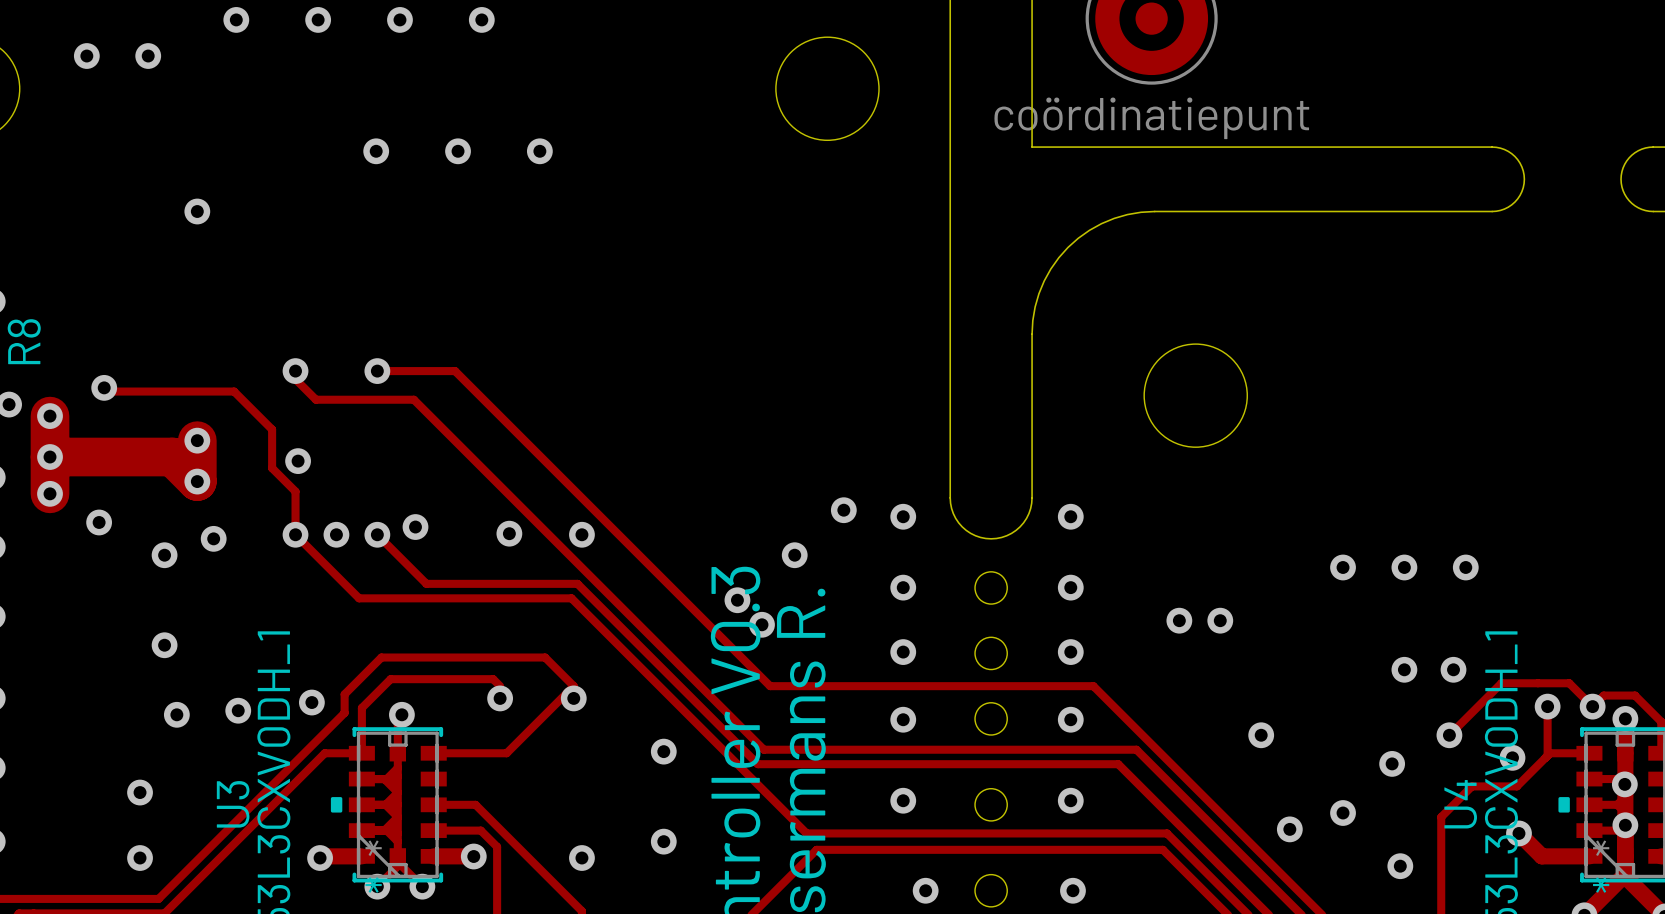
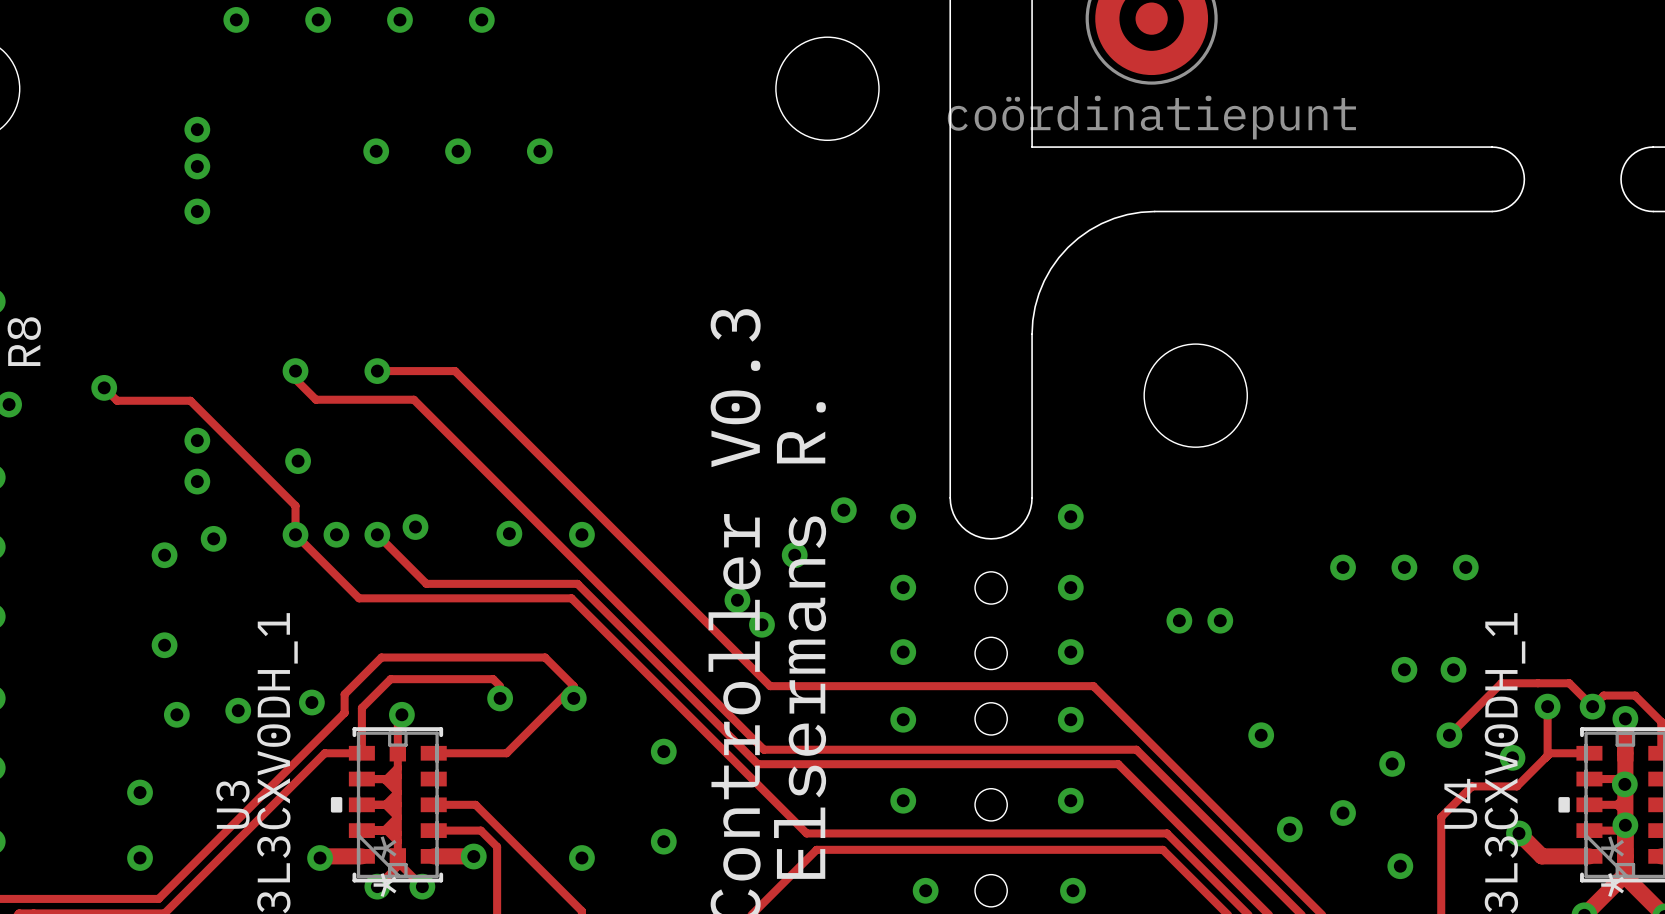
via: (86, 56) -> none
via: (148, 56) -> none
via: none -> (197, 129)
via: none -> (197, 166)
track: (107, 391) (234, 391) (272, 429) (272, 468) (295, 491) (295, 505) -> (107, 391) (117, 400) (190, 400) (295, 505)
track: (50, 416) (50, 493) -> none
via: (50, 416) -> none
track: (197, 440) (197, 481) (172, 457) (50, 457) -> none
via: (50, 457) -> none
via: (50, 493) -> none
via: (99, 522) -> none

